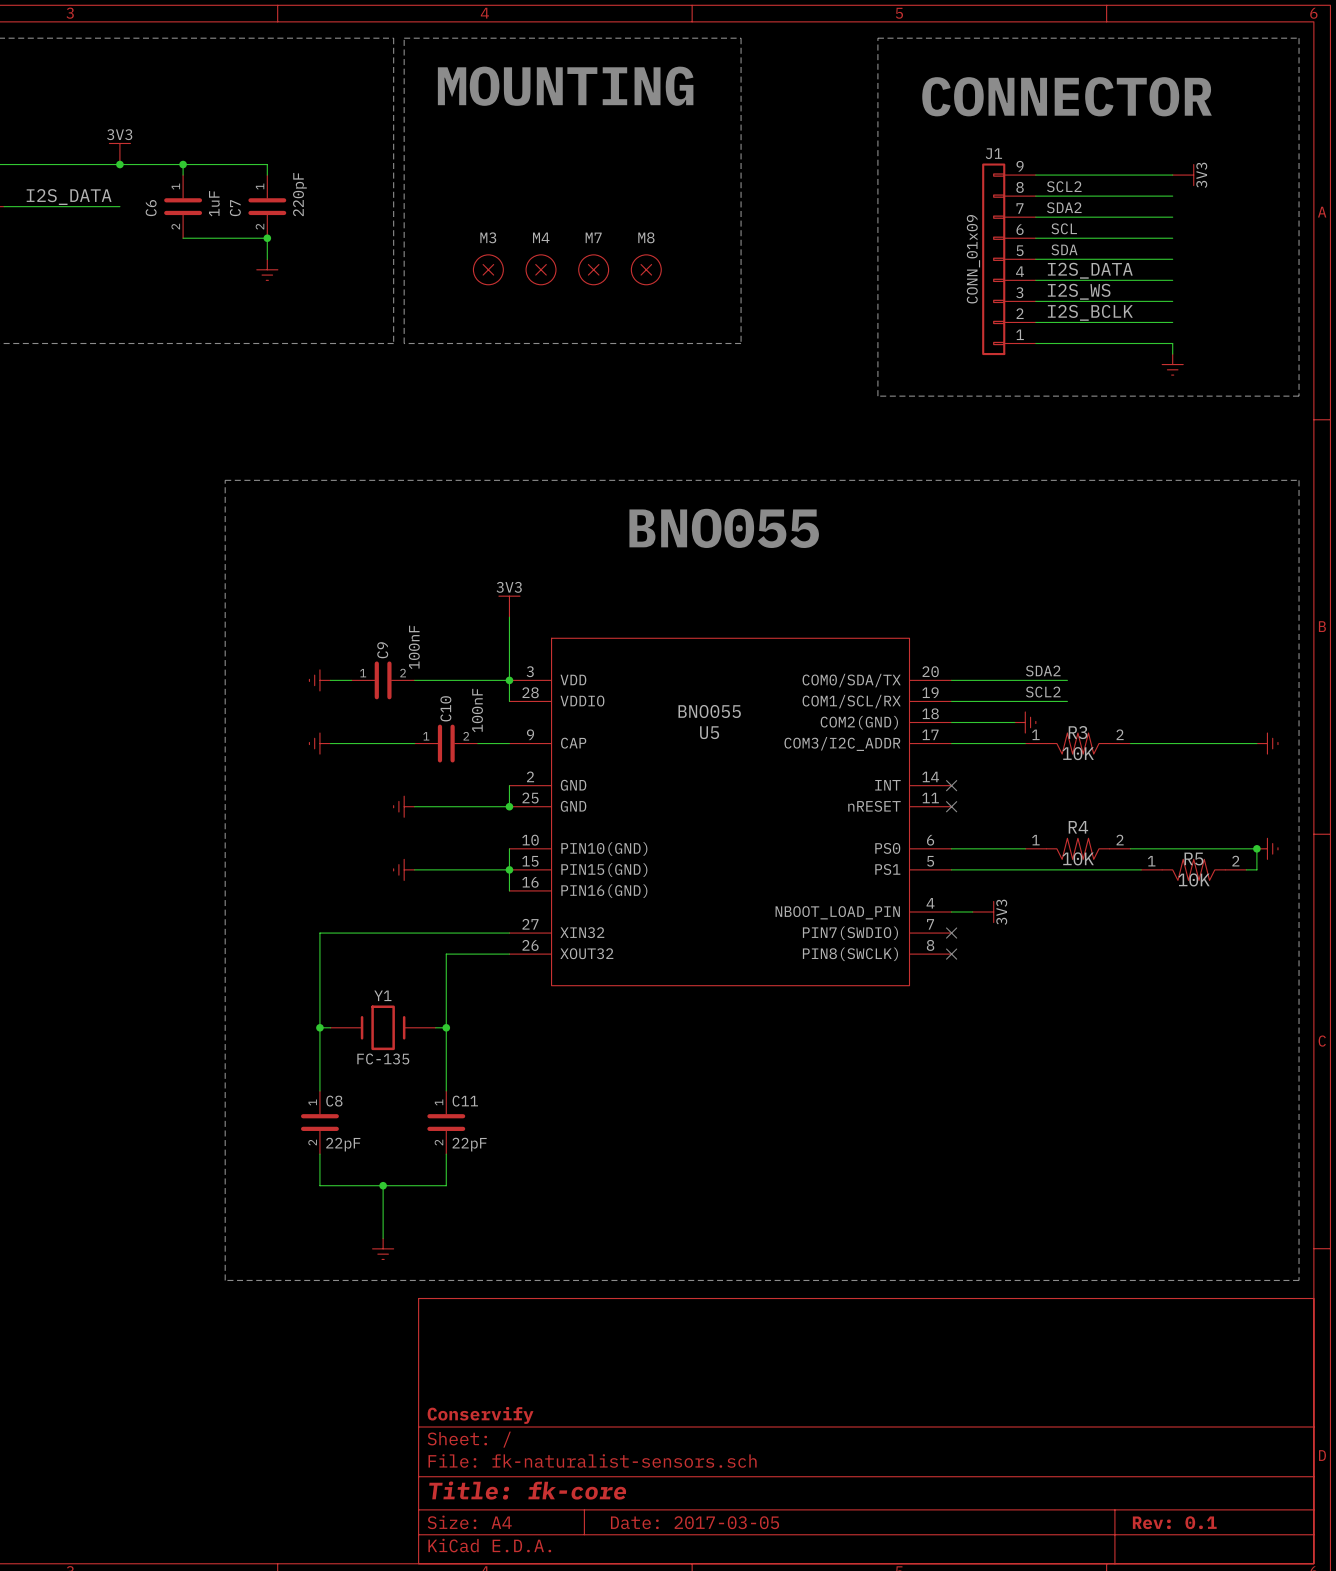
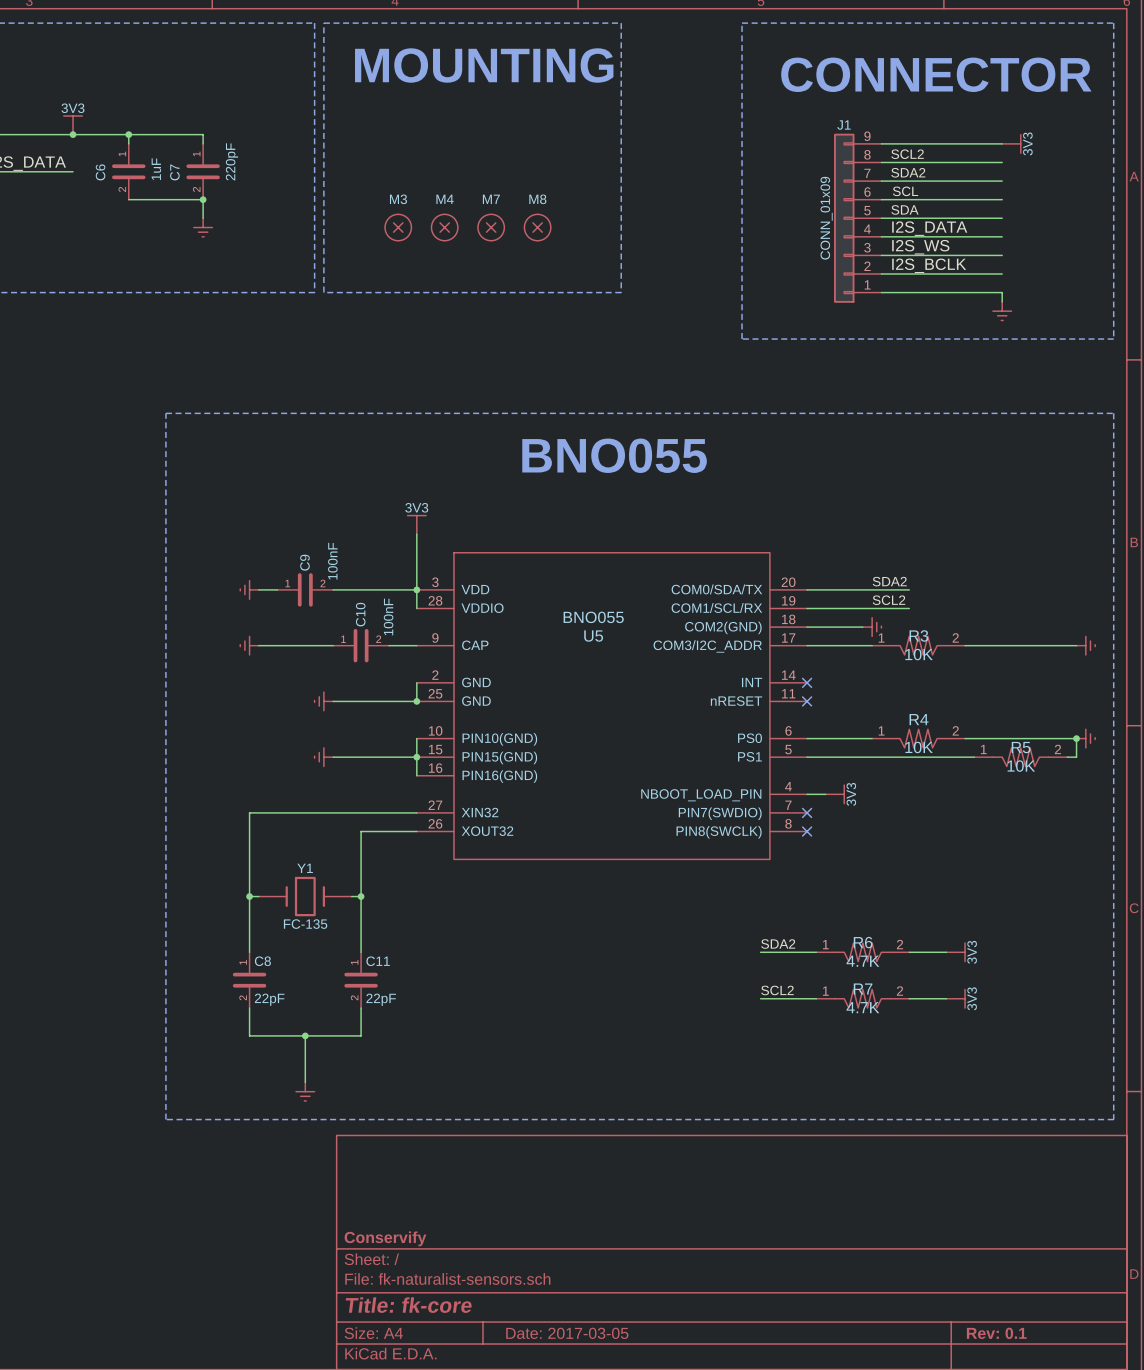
label: none -> SDA2 (778, 944)
wire: none -> (760, 952) (816, 952)
R6: none -> 4.7K (862, 952)
wire: none -> (909, 952) (946, 952)
power symbol: none -> 3V3 (955, 952)
label: none -> SCL2 (777, 990)
wire: none -> (760, 998) (816, 998)
R7: none -> 4.7K (862, 998)
wire: none -> (909, 998) (946, 998)
power symbol: none -> 3V3 (955, 998)

